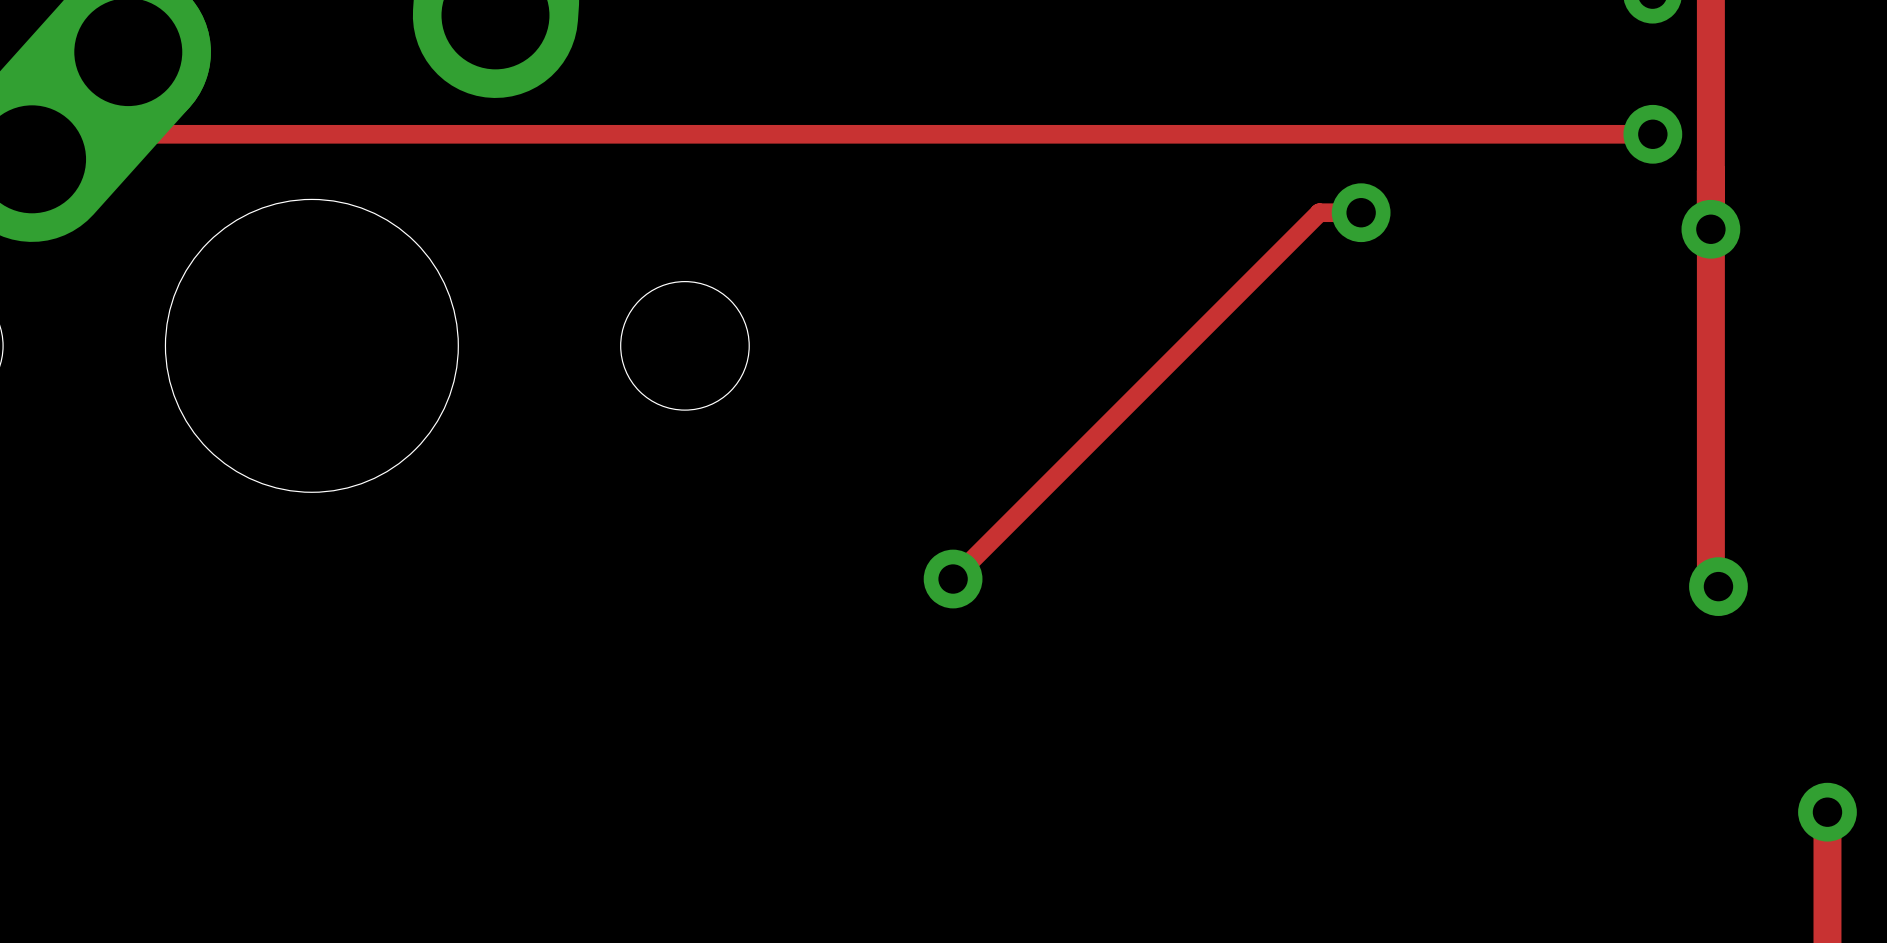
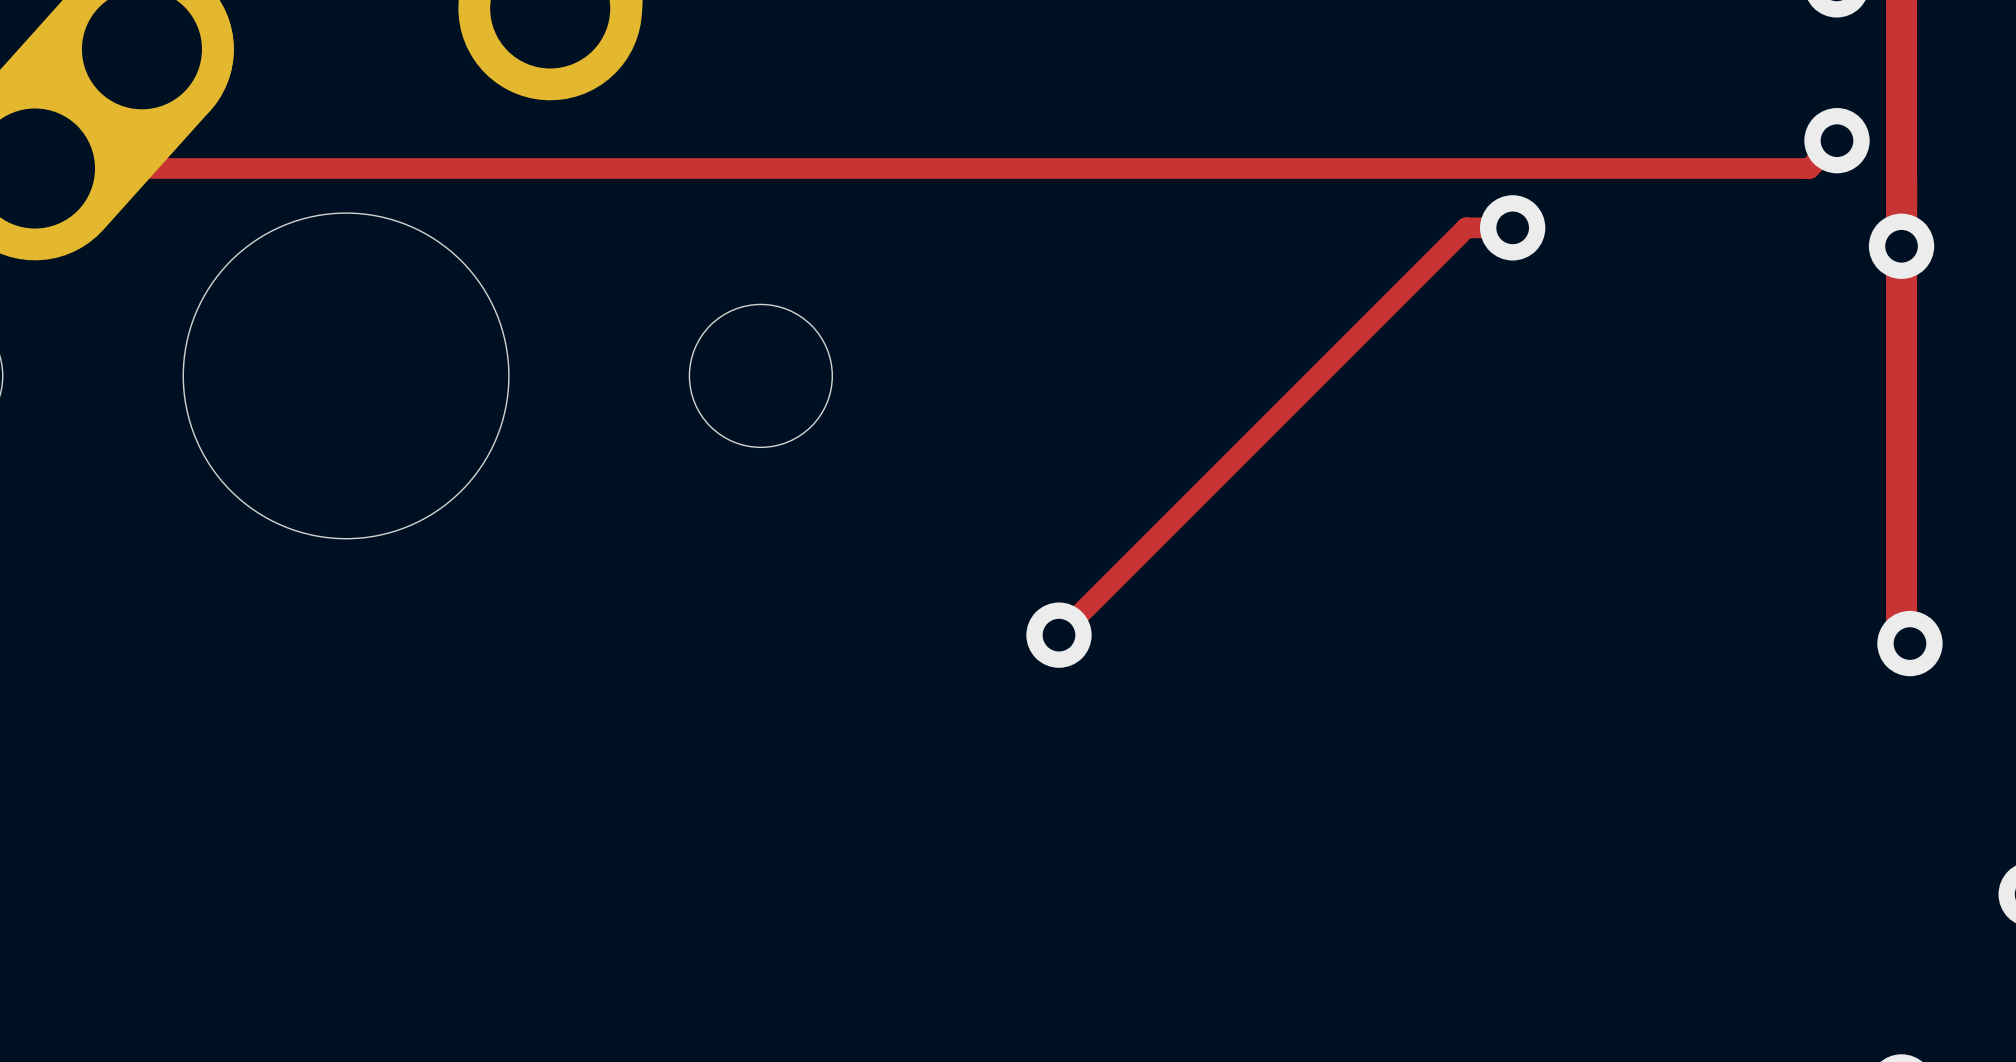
track: (57, 134) (1652, 134) -> (34, 168) (1809, 168) (1836, 140)

